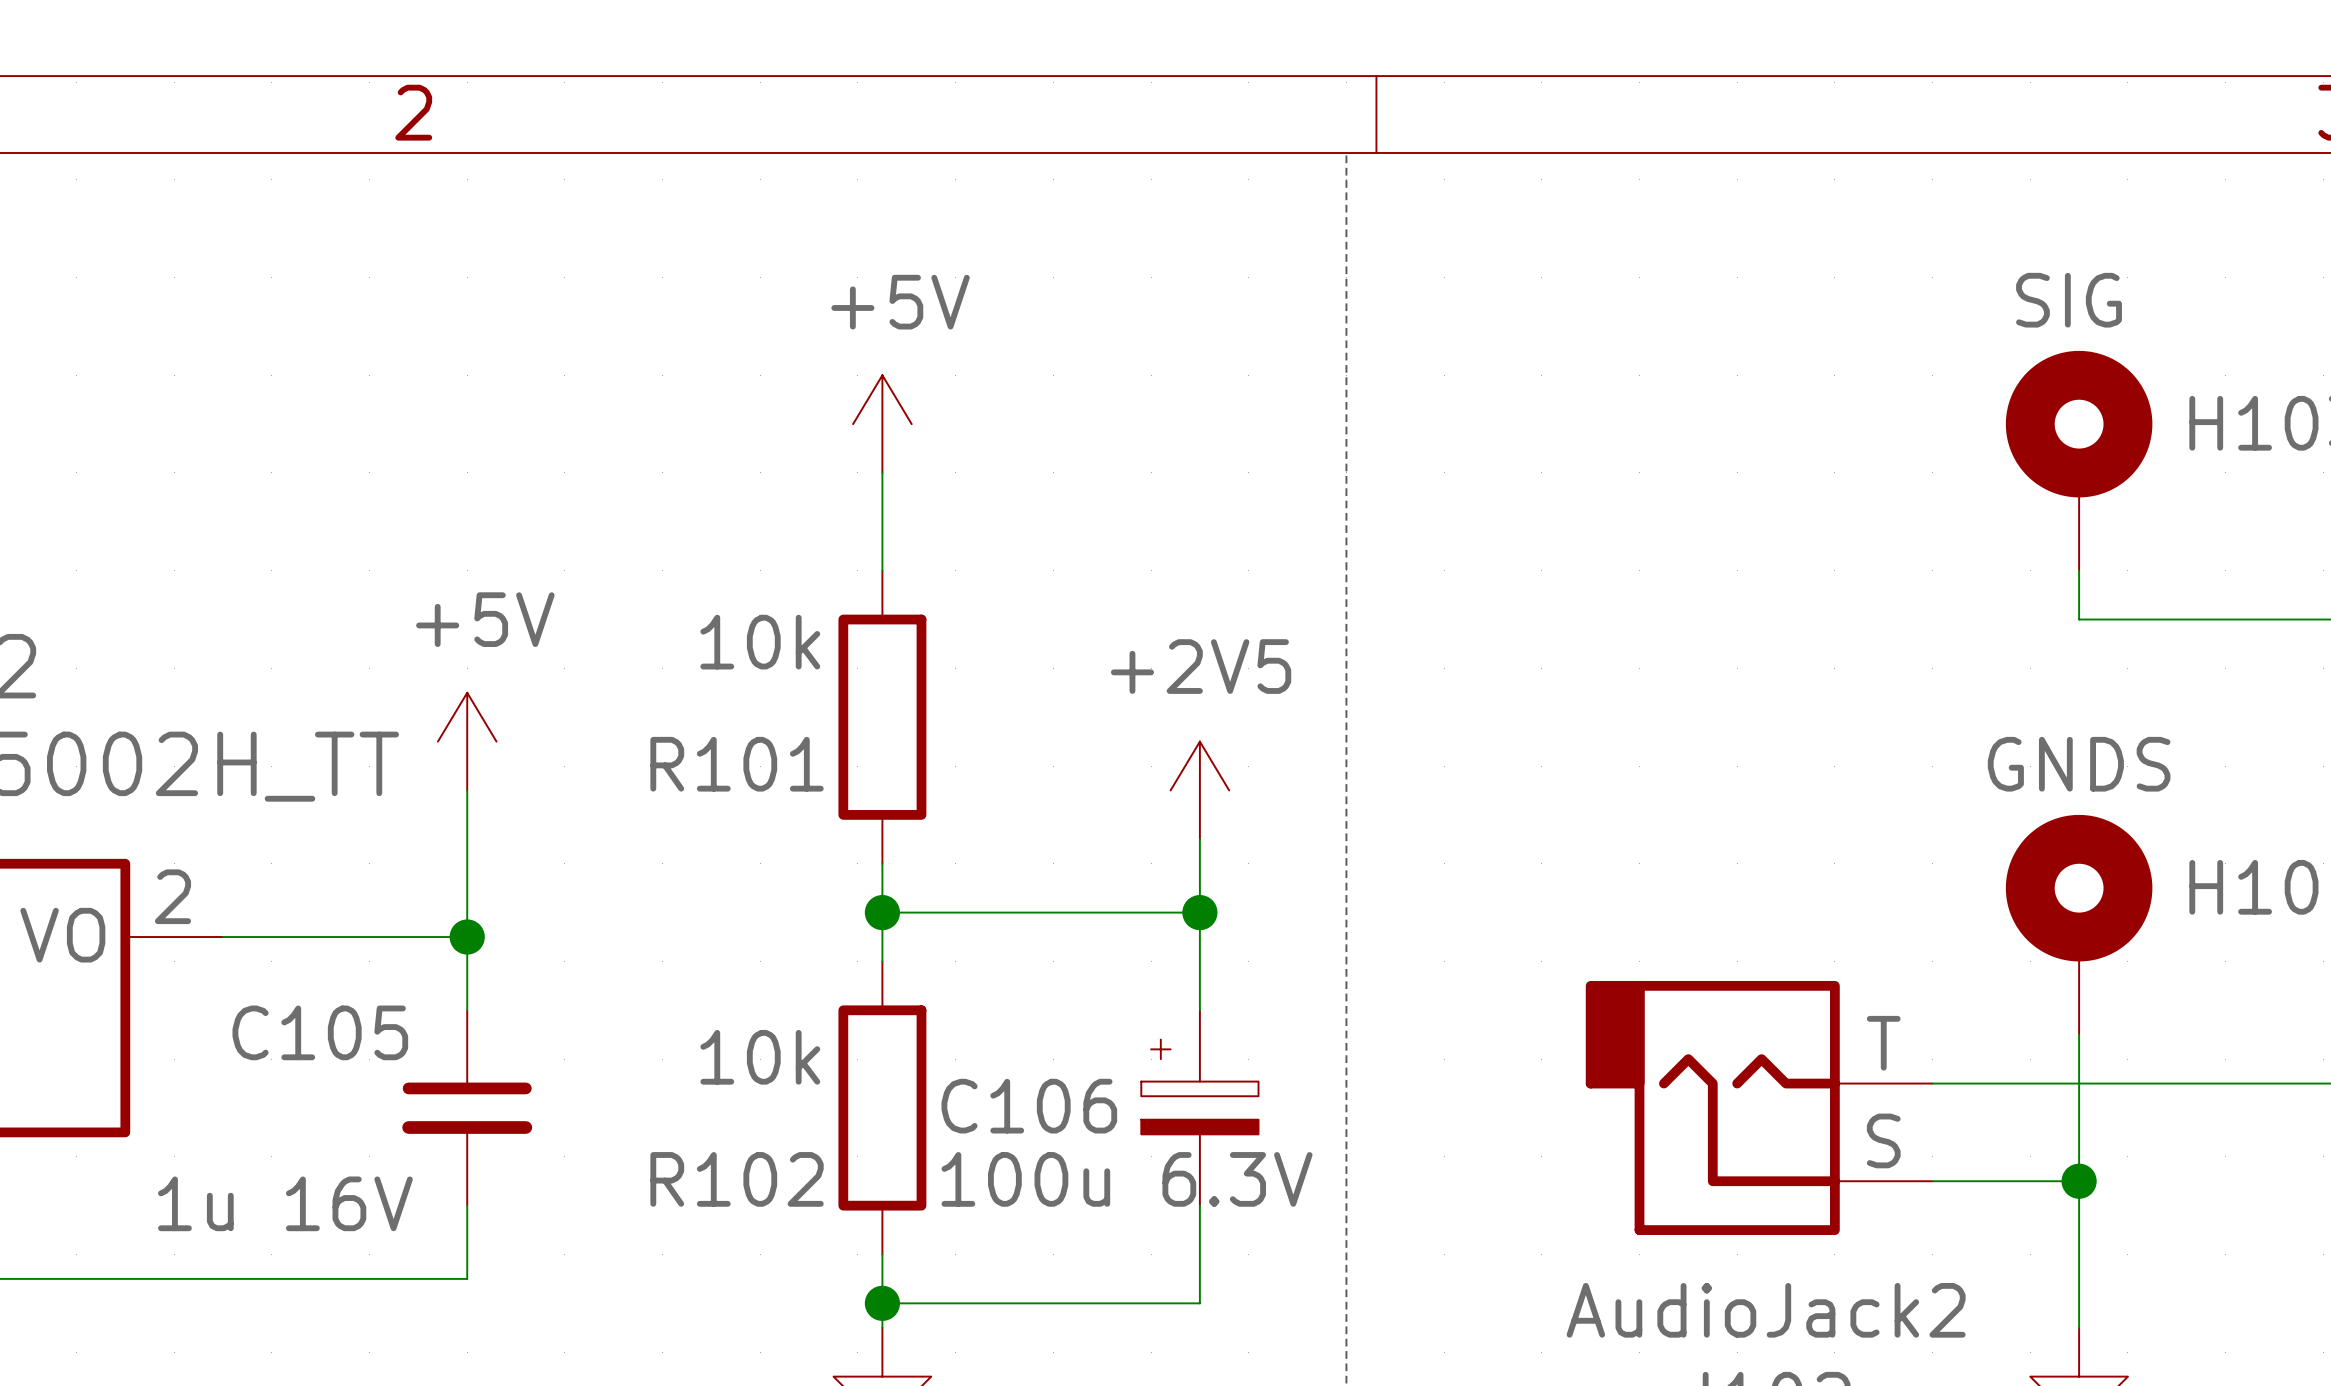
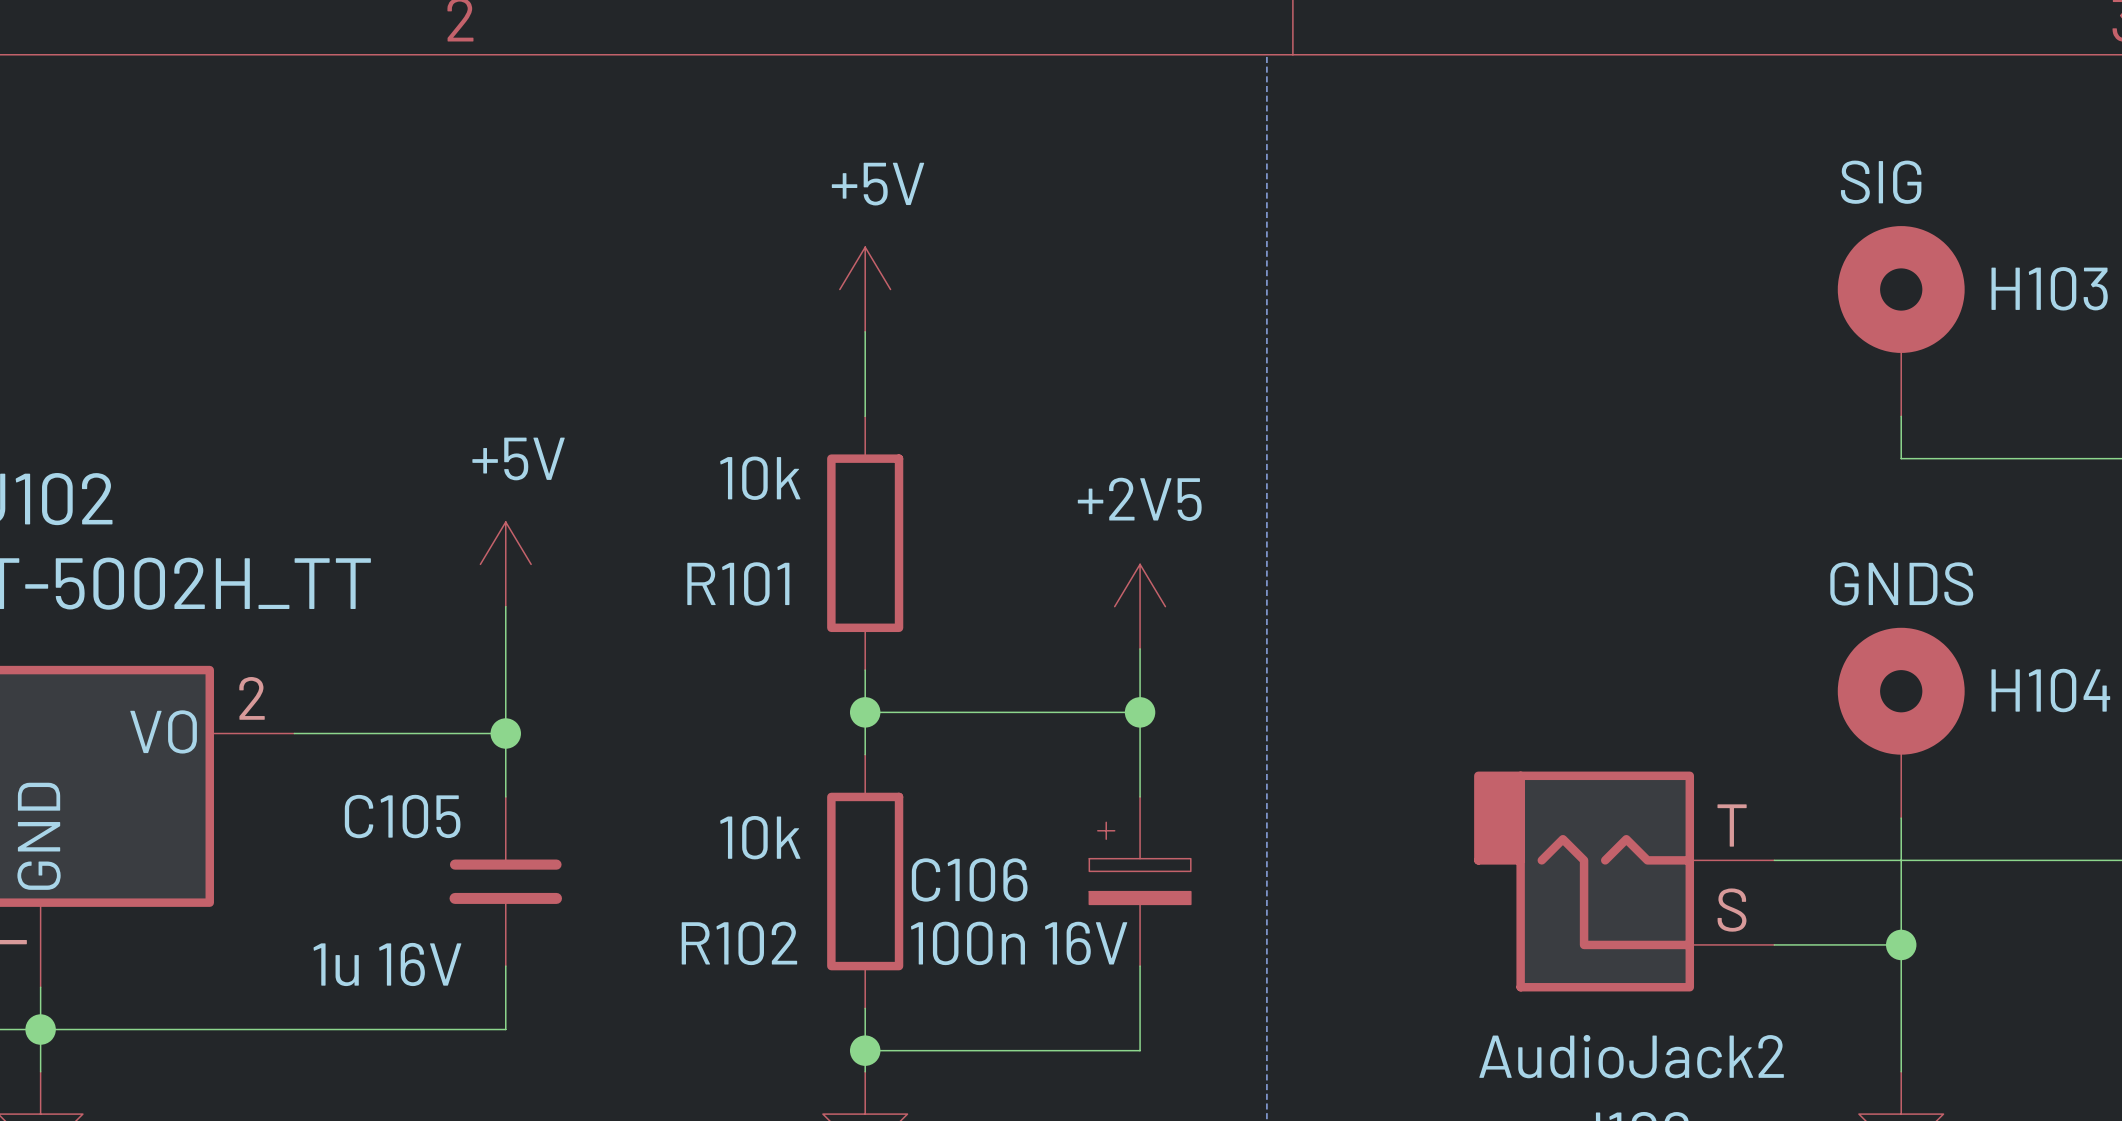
C106 value: 100u 6.3V (1127, 1179) -> 100n 16V (1019, 943)

